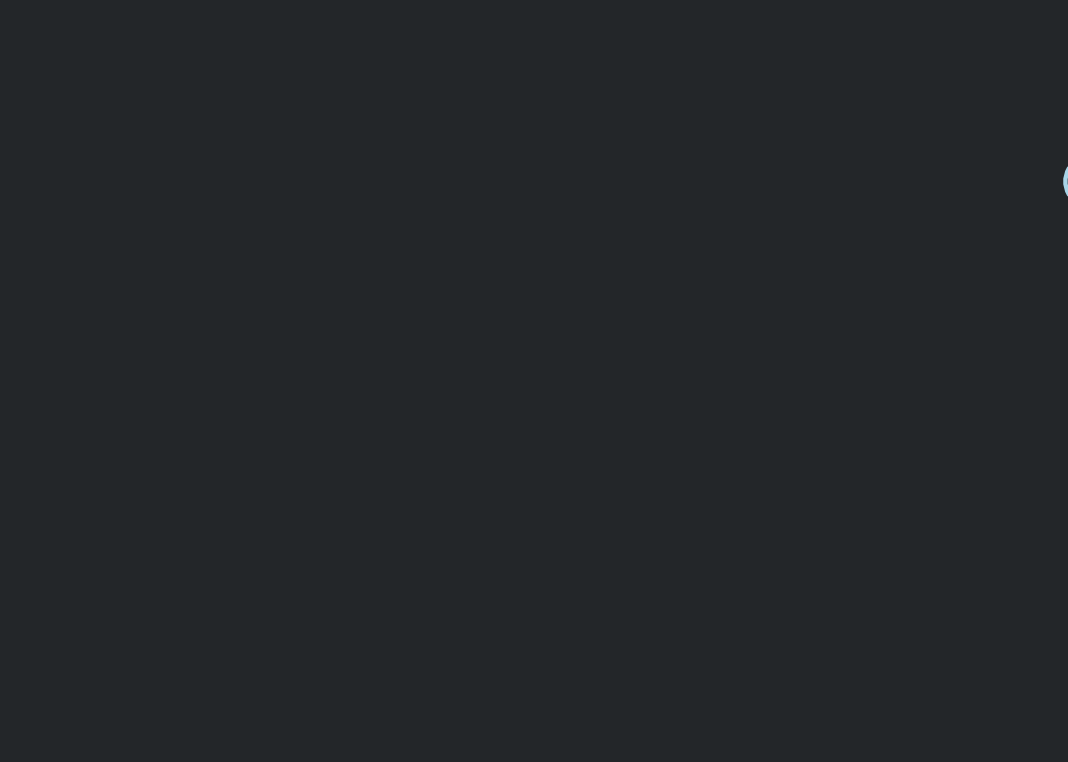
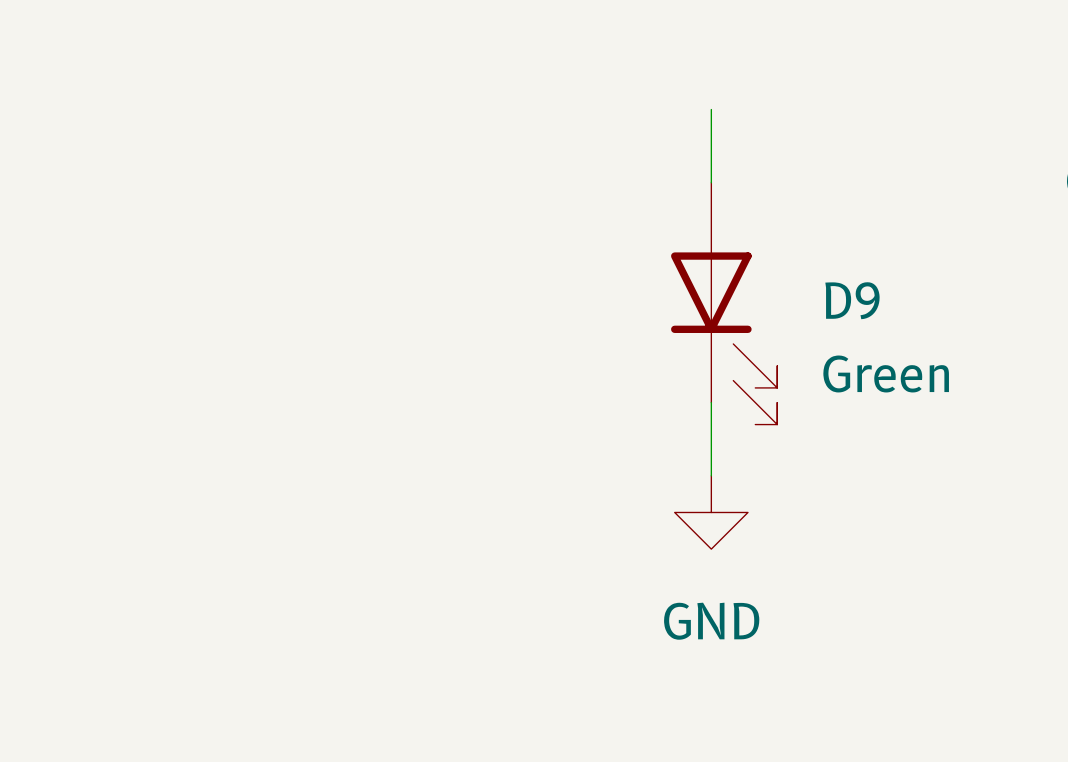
wire: none -> (711, 109) (711, 182)
D9: none -> Green (724, 303)
wire: none -> (711, 402) (711, 475)
power symbol: none -> GND (711, 512)

